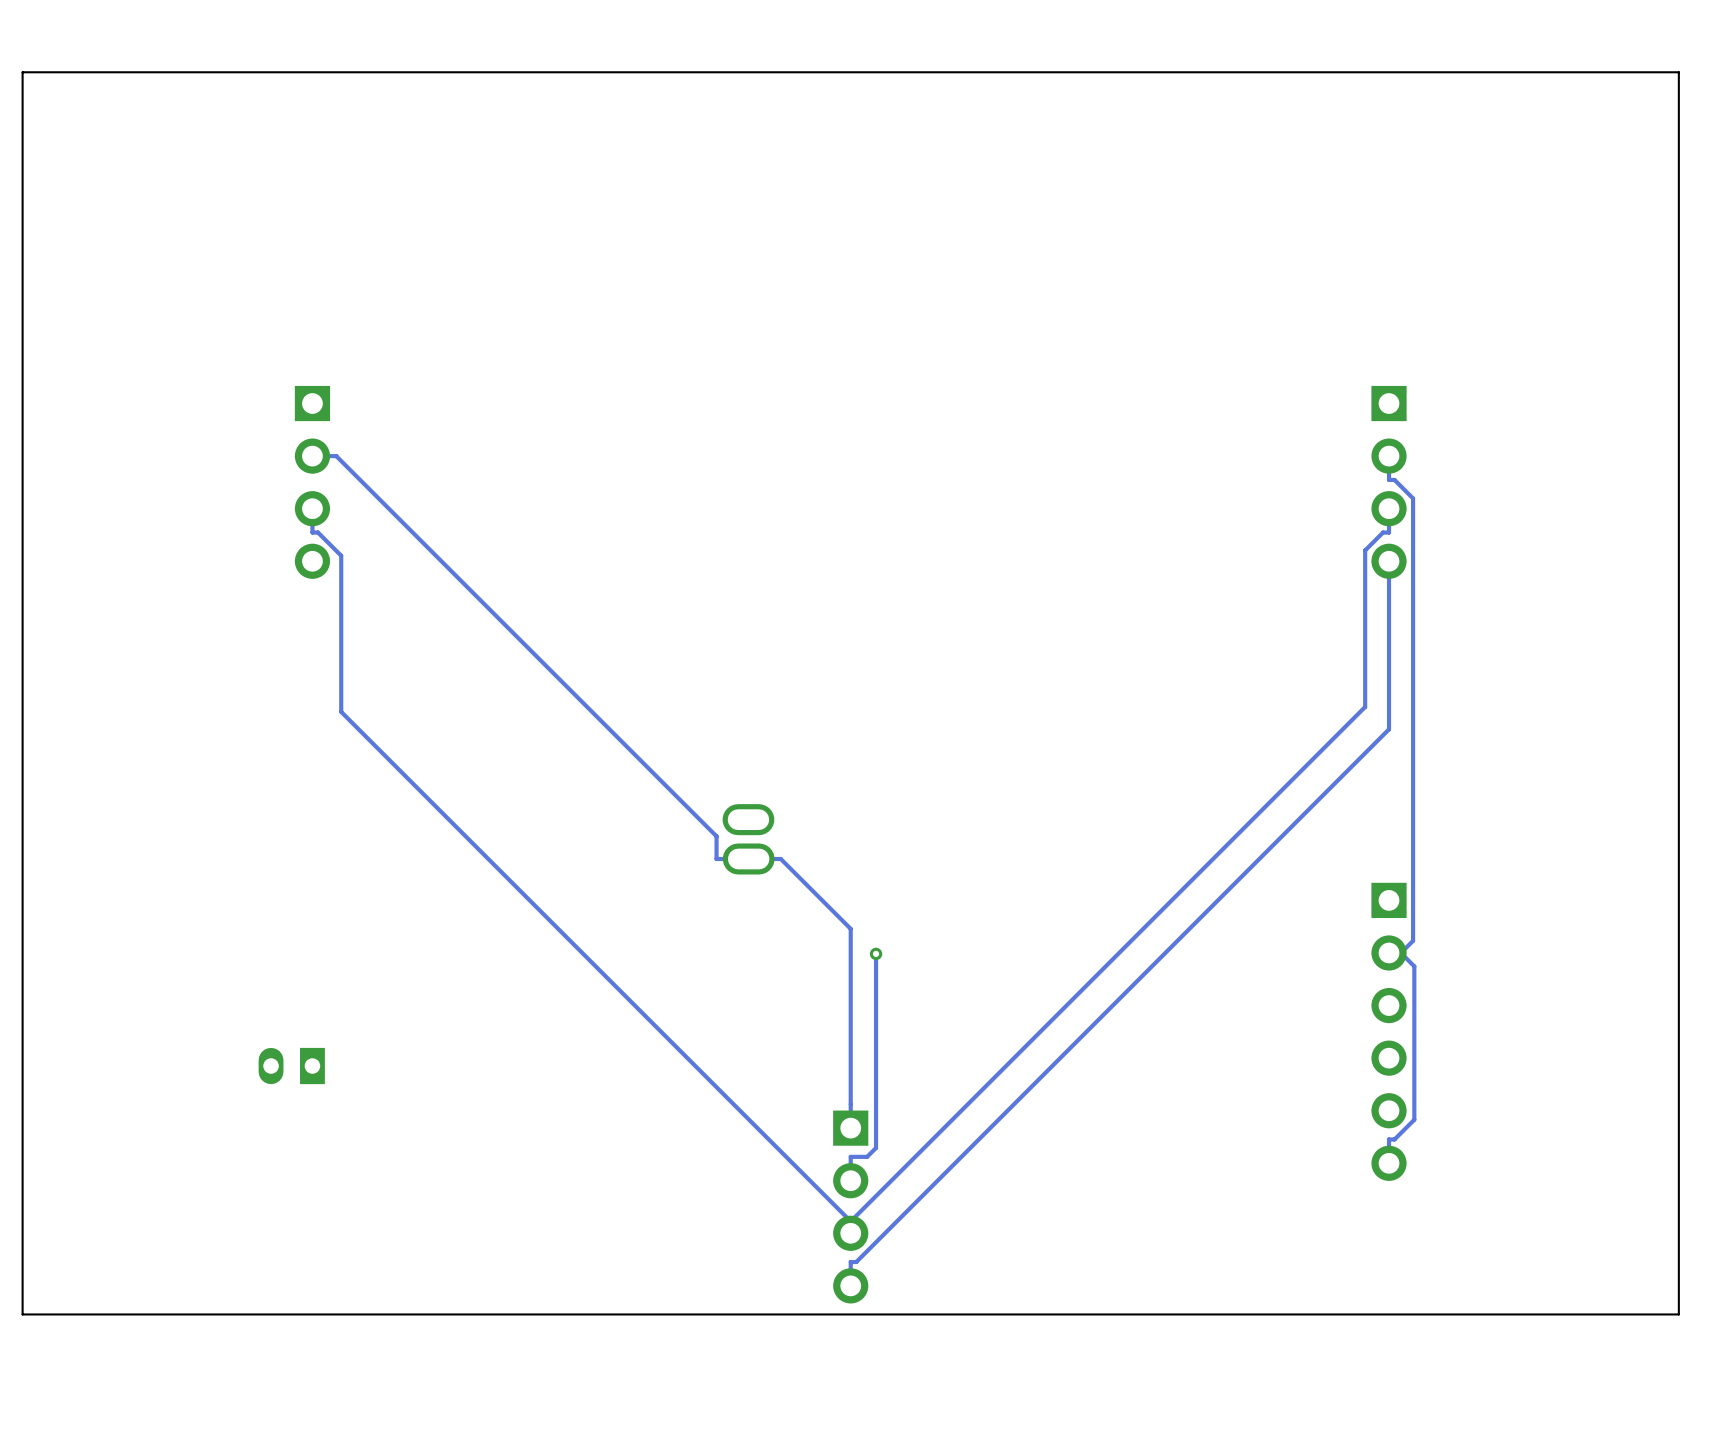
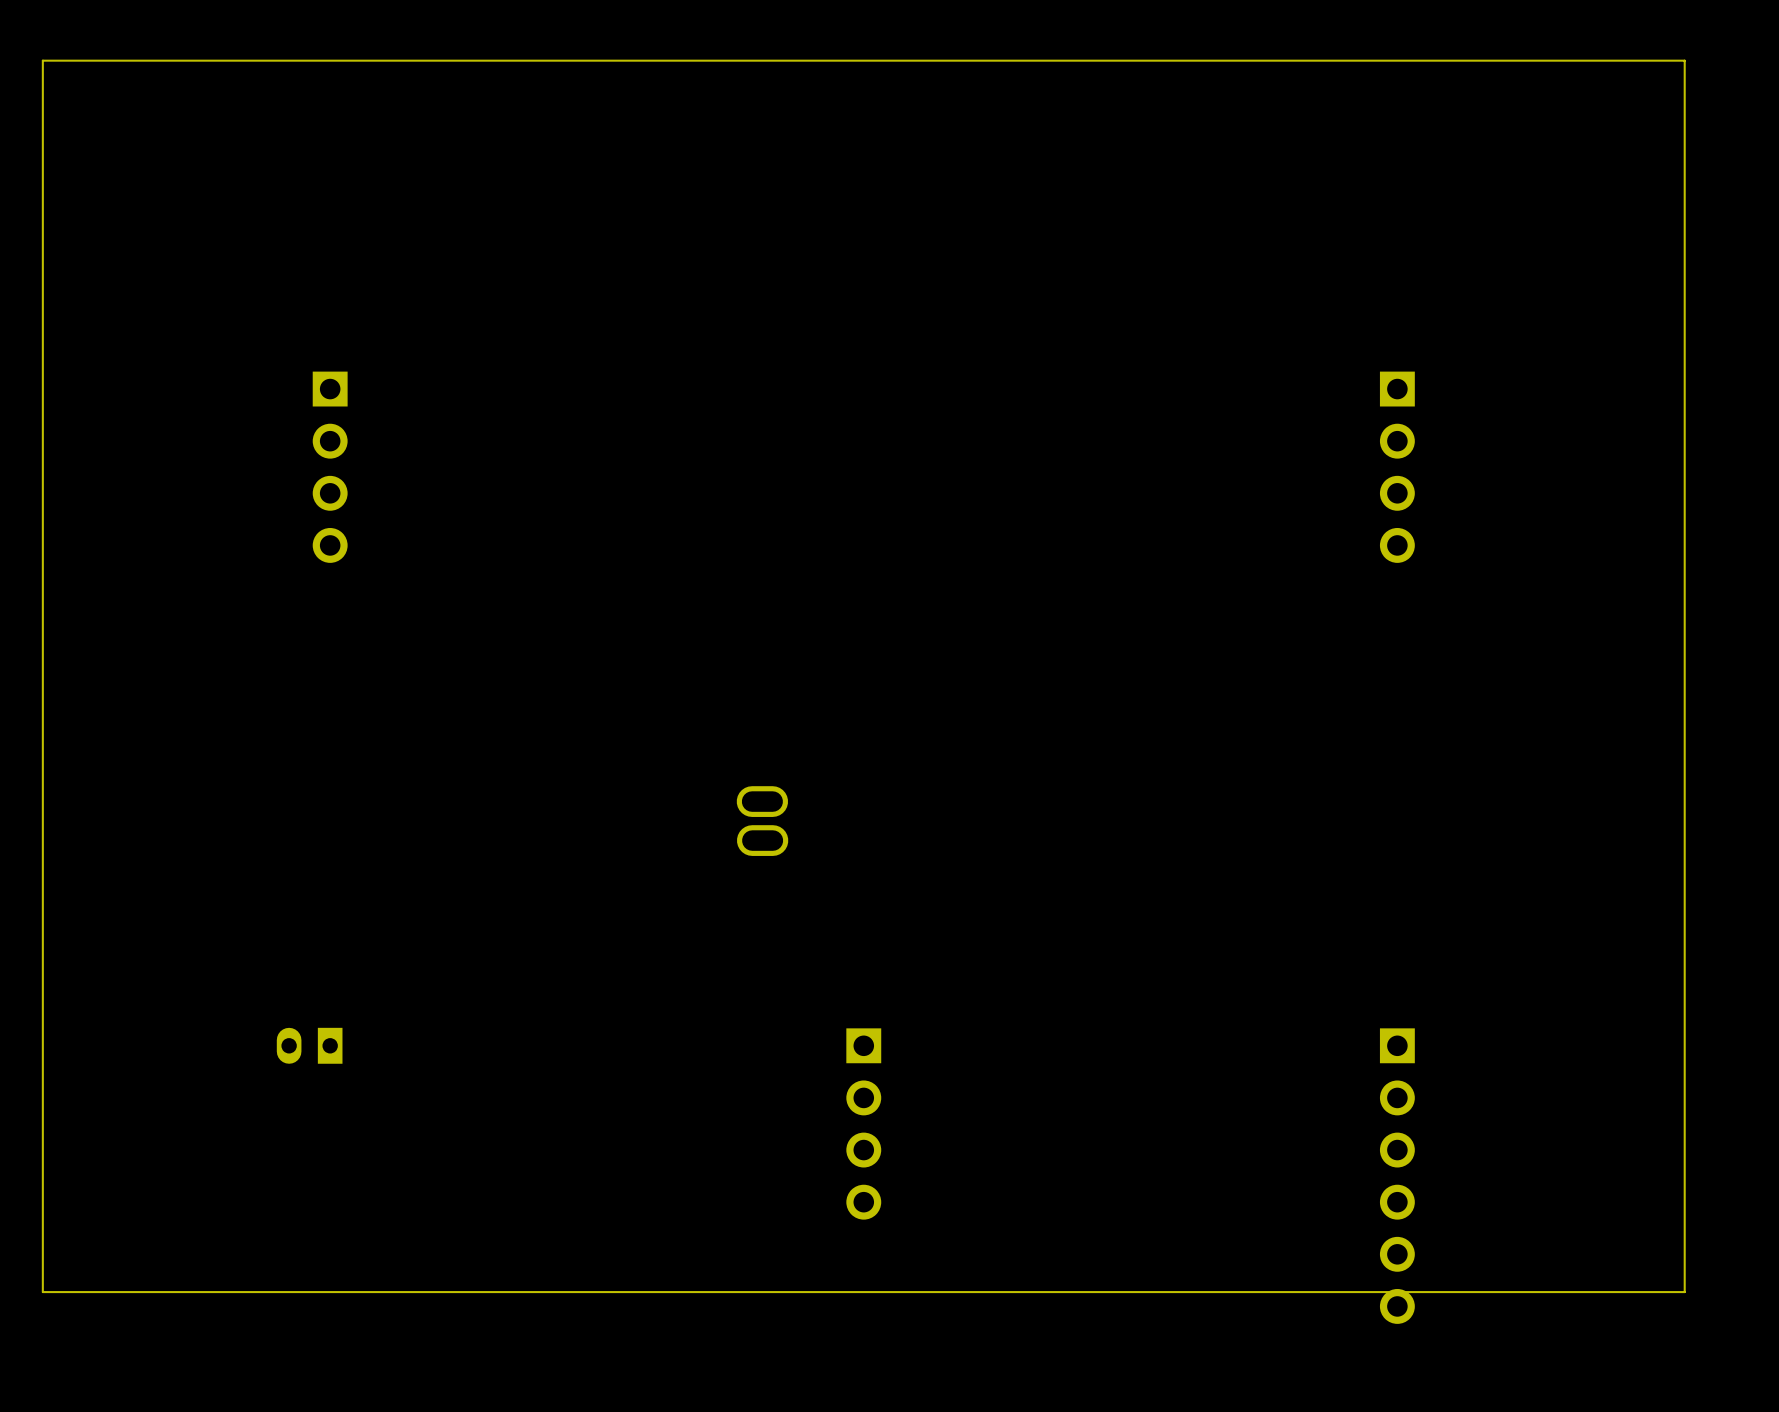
track: (312, 456) (336, 456) (716, 836) (716, 858) (780, 858) (850, 928) (850, 1128) -> none
track: (1389, 456) (1389, 479) (1394, 479) (1413, 498) (1413, 940) (1400, 952) -> none
track: (312, 508) (312, 532) (318, 532) (341, 555) (341, 711) (850, 1221) -> none
track: (1389, 508) (1389, 532) (1383, 532) (1365, 550) (1365, 706) (850, 1221) -> none
track: (1389, 561) (1389, 729) (856, 1262) (850, 1262) (850, 1285) -> none
track: (1400, 952) (1414, 966) (1414, 1119) (1394, 1139) (1389, 1139) (1389, 1163) -> none
track: (876, 953) (876, 1147) (867, 1156) (850, 1156) (850, 1180) -> none
via: (876, 953) -> none
part position: (1389, 1031) -> (1397, 1176)
part position: (850, 1207) -> (863, 1123)

